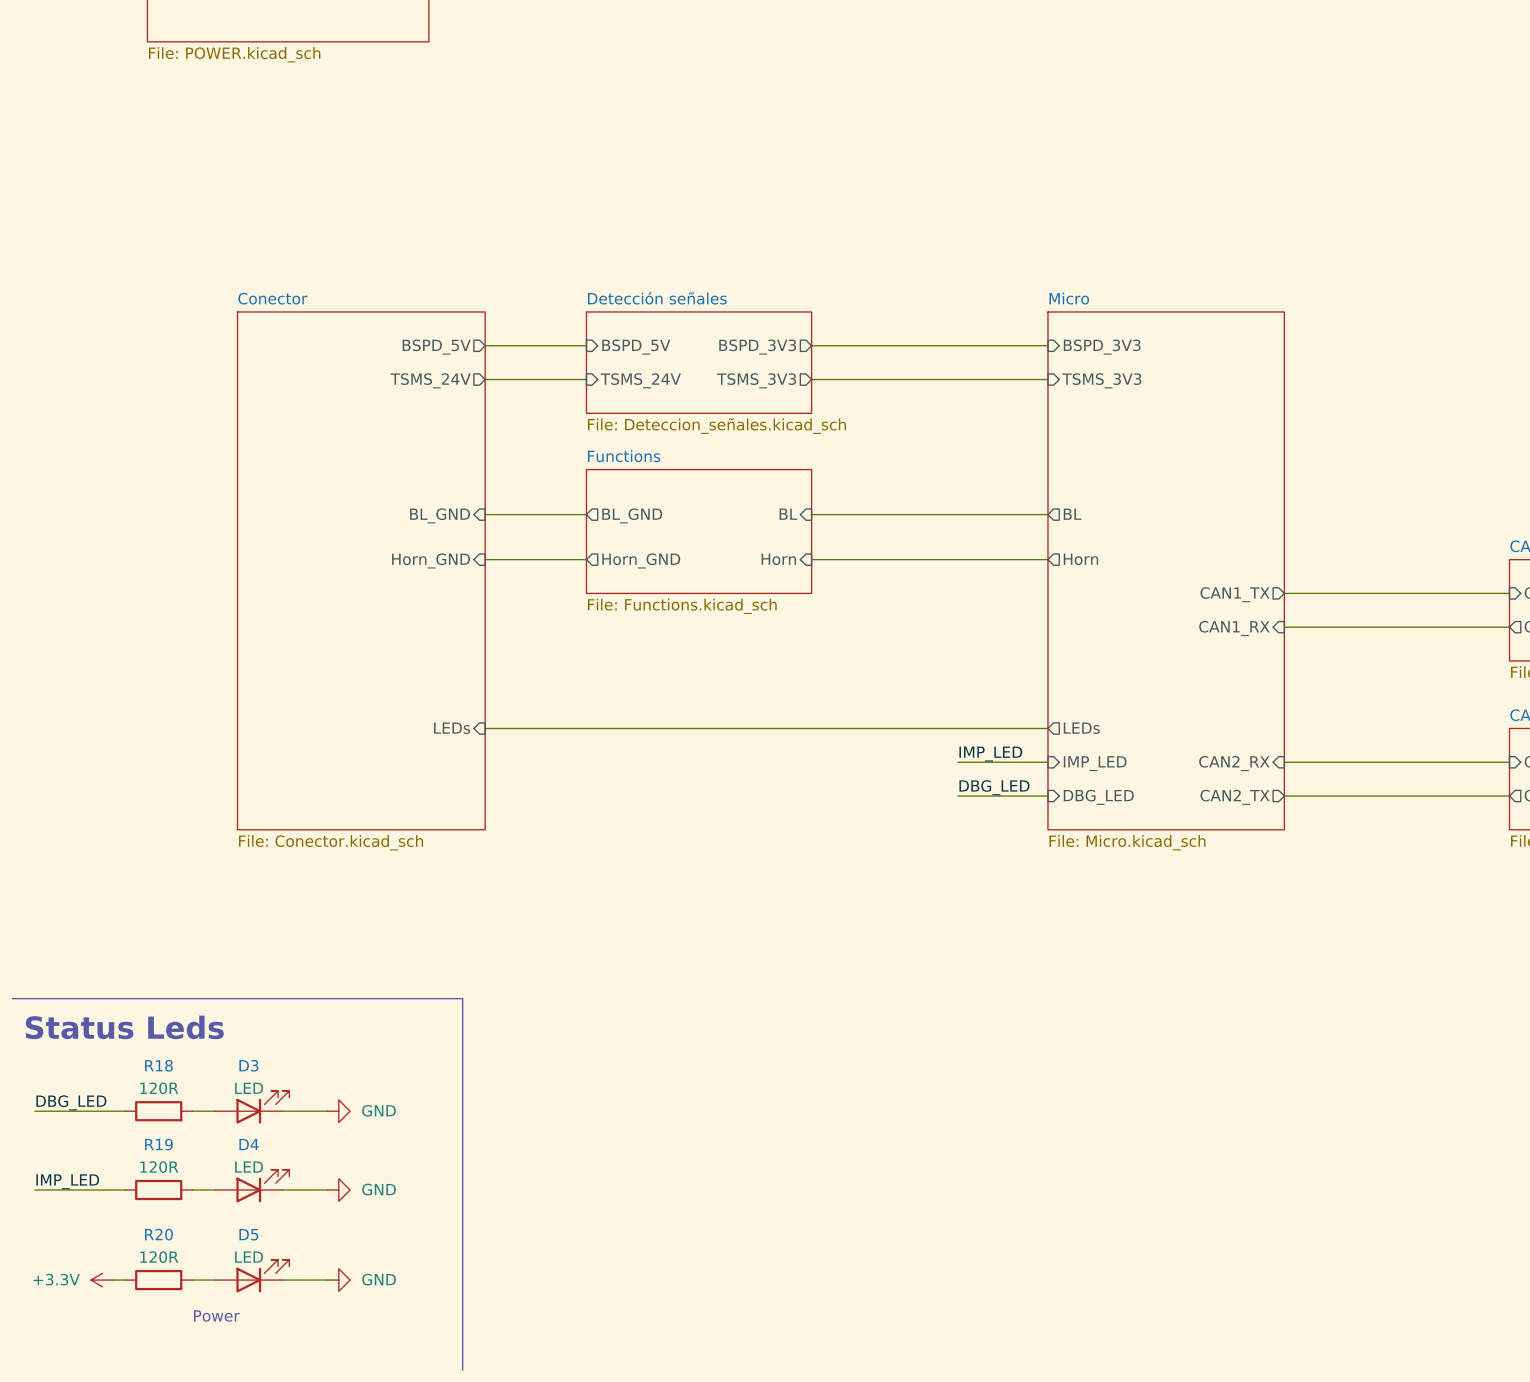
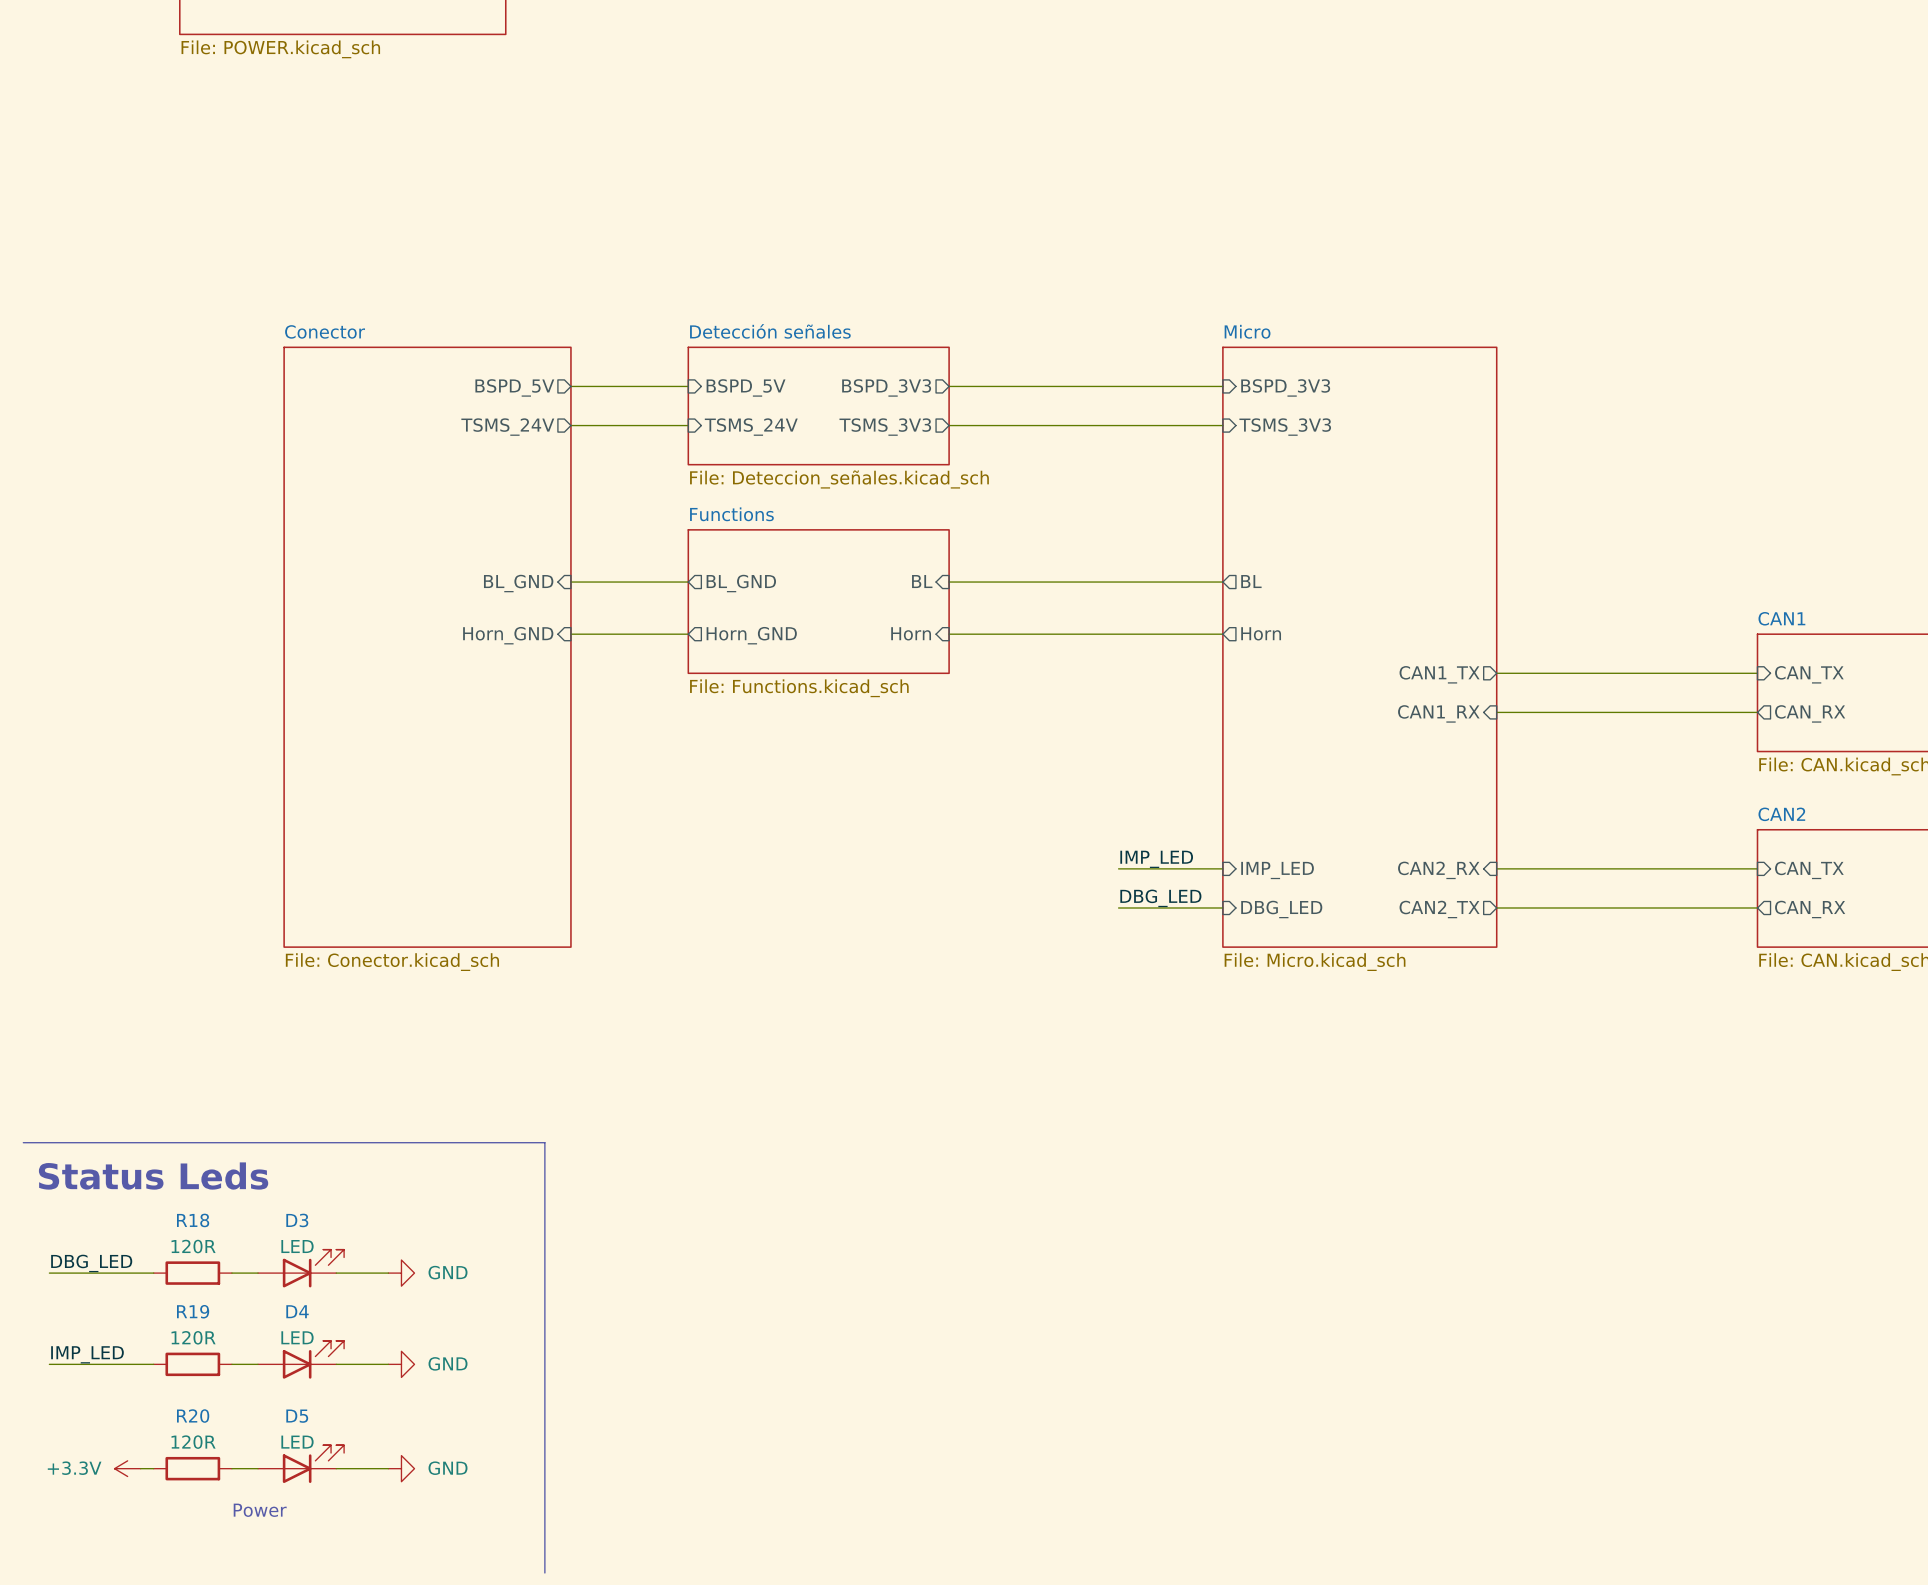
sheet pin: LEDs (452, 728) -> none
wire: (485, 728) (1047, 728) -> none
sheet pin: LEDs (1081, 728) -> none

